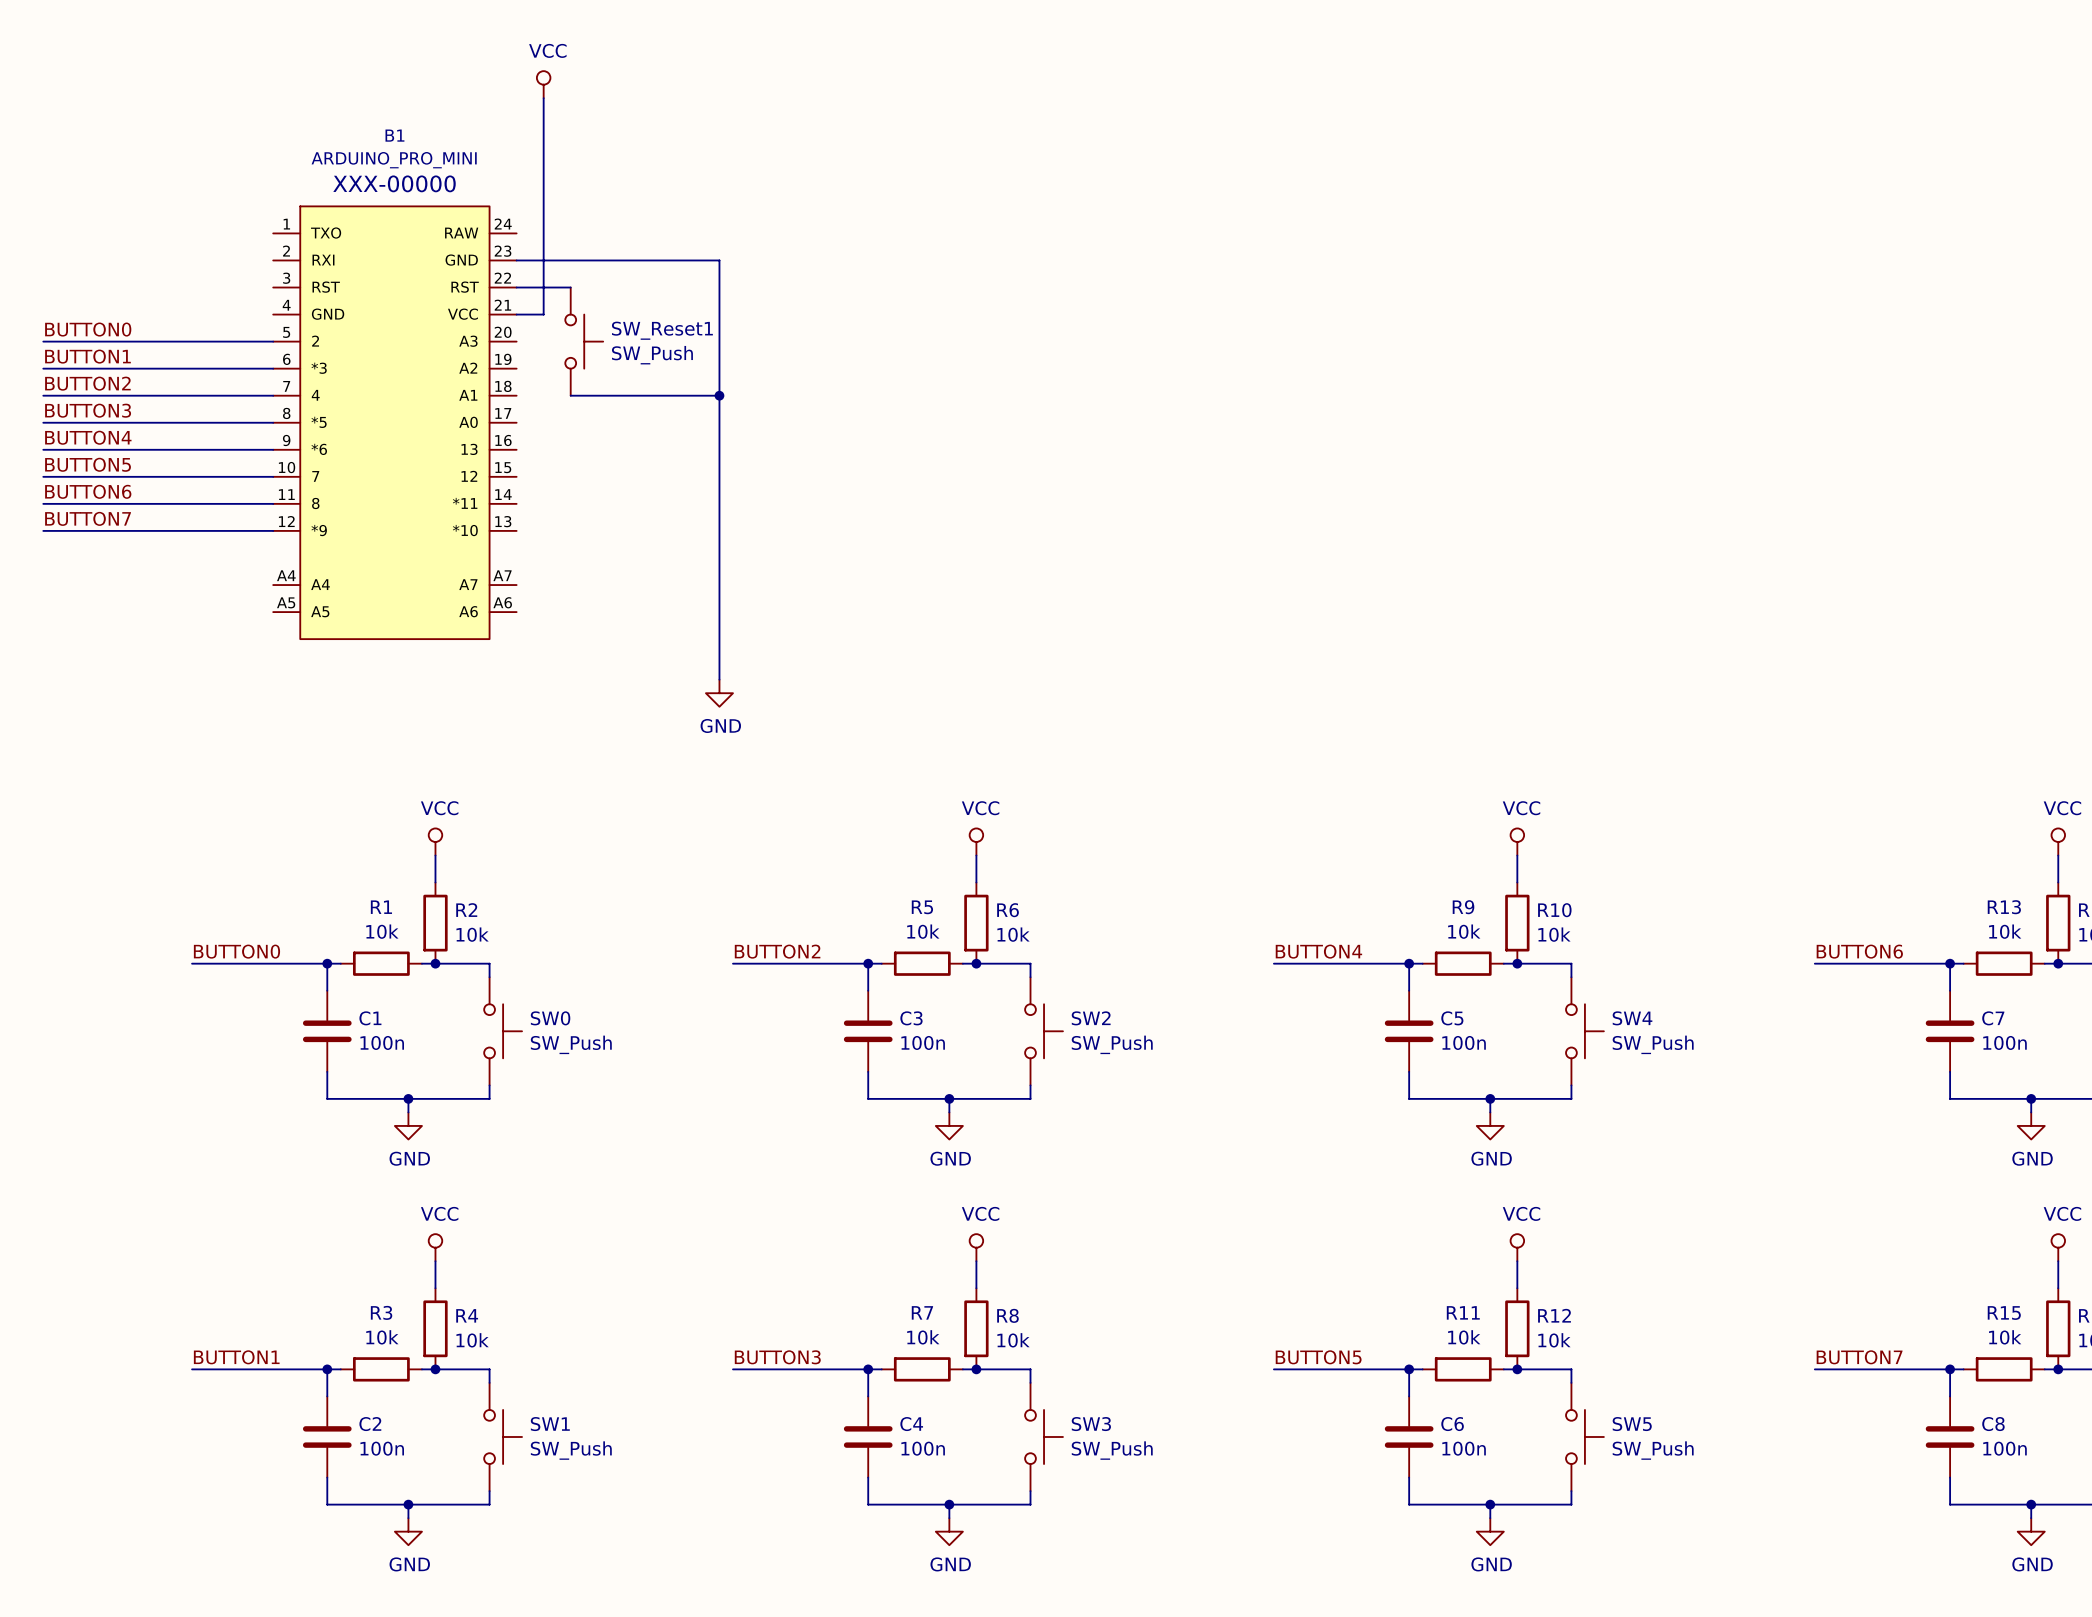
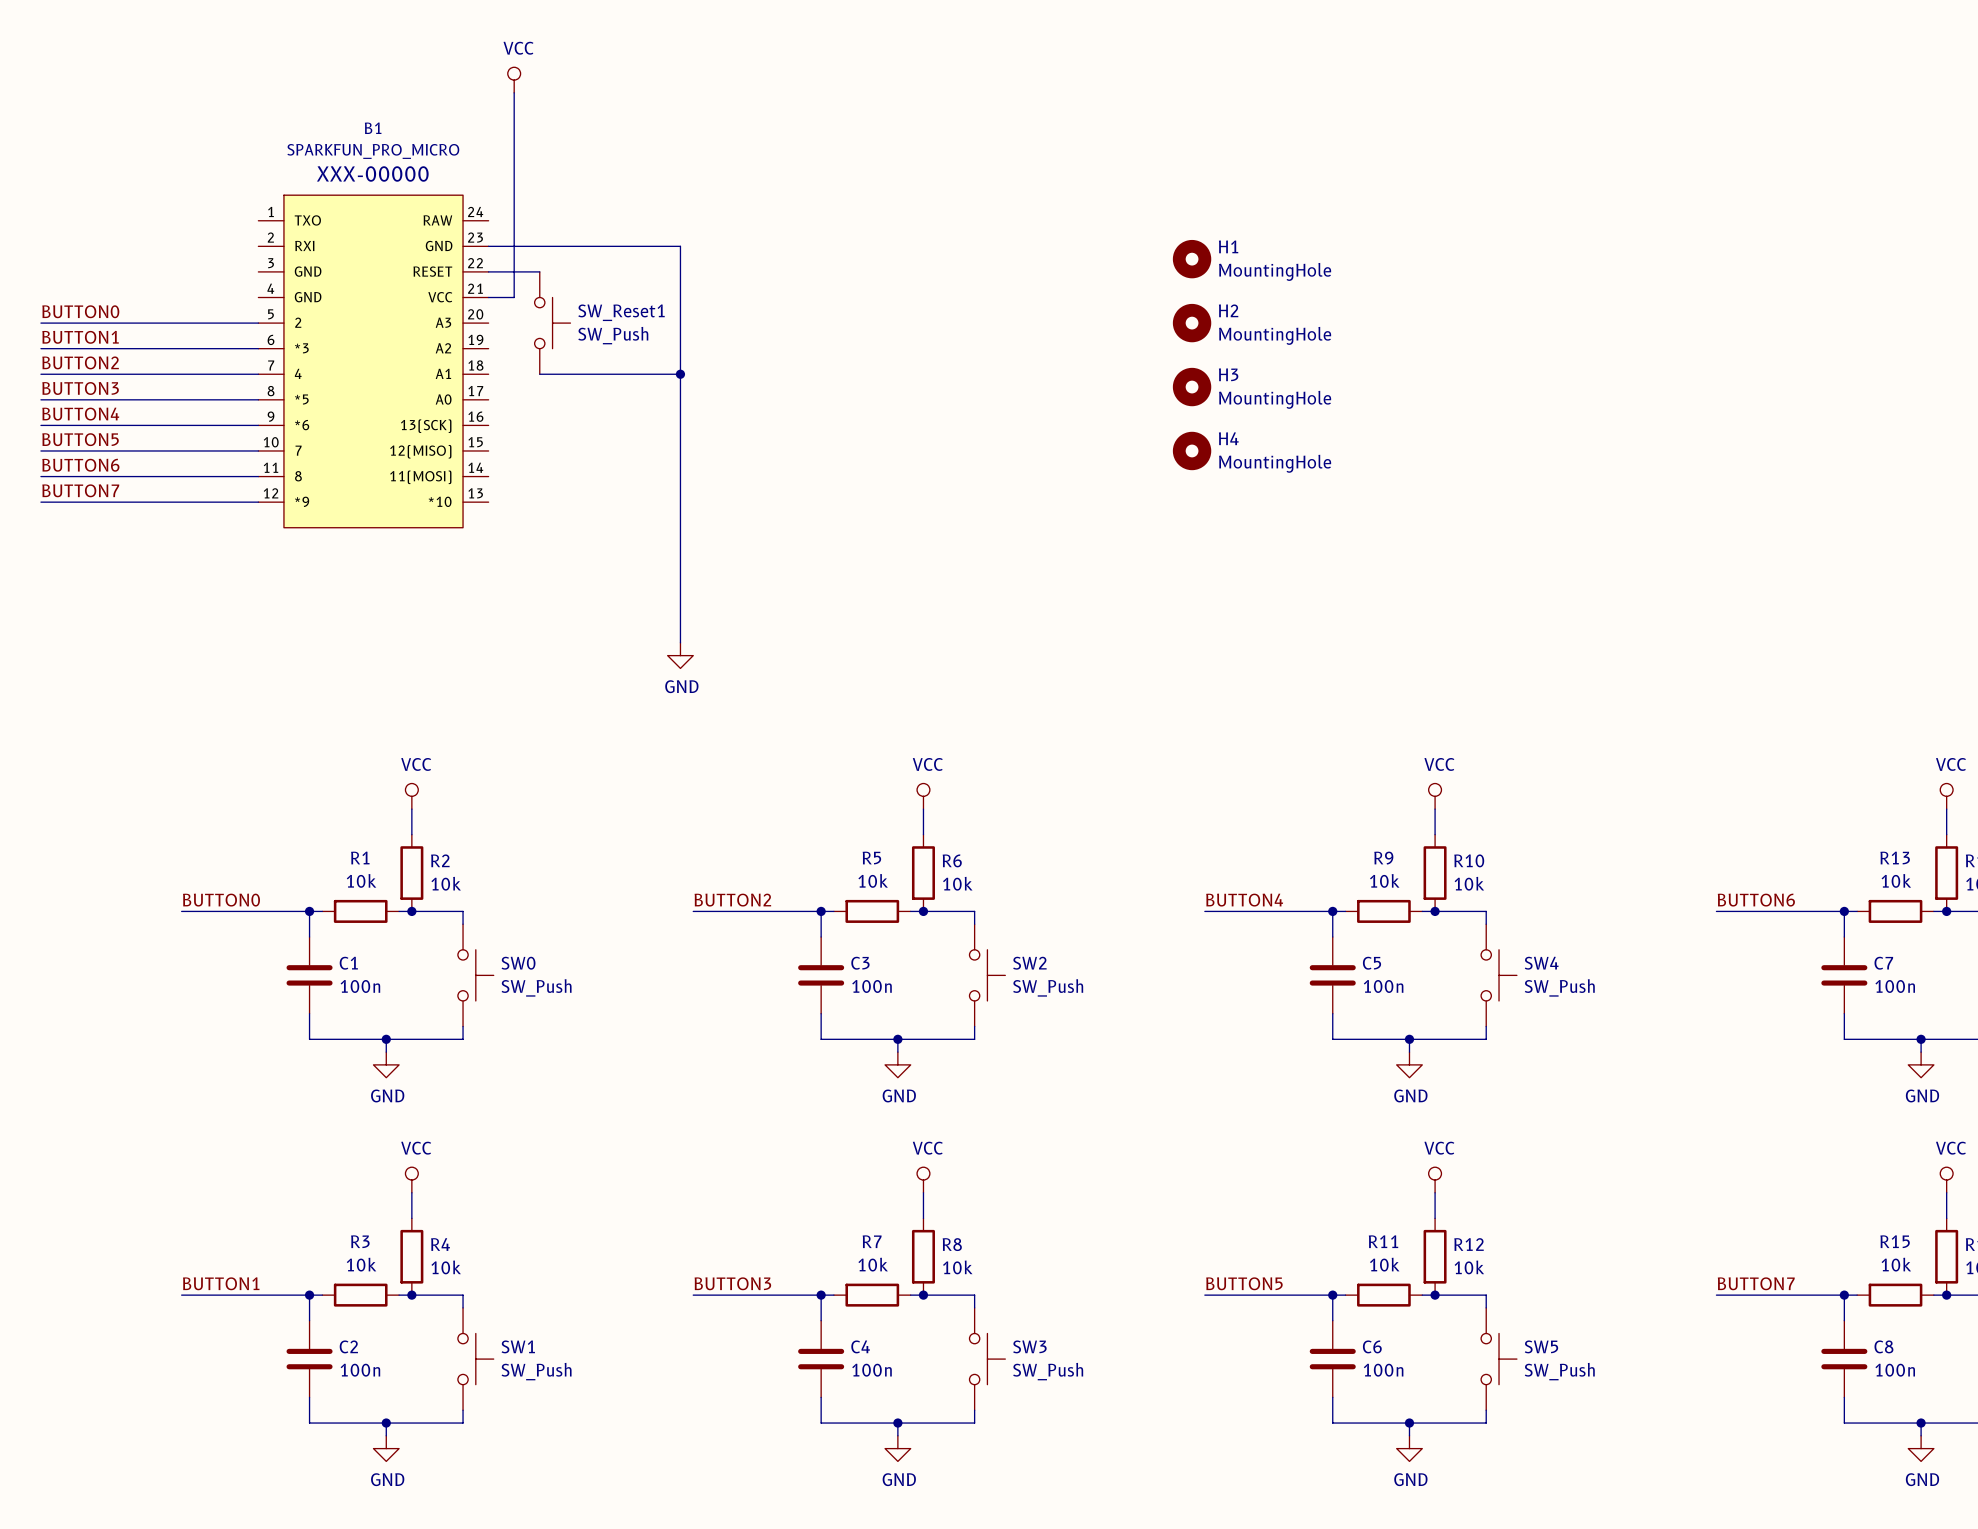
B1 value: ARDUINO_PRO_MINI (394, 160) -> SPARKFUN_PRO_MICRO (373, 151)
B1 symbol: [273, 206, 517, 640] -> [258, 195, 489, 528]
H1: none -> MountingHole (1192, 259)
H2: none -> MountingHole (1192, 323)
H3: none -> MountingHole (1192, 387)
H4: none -> MountingHole (1192, 450)

